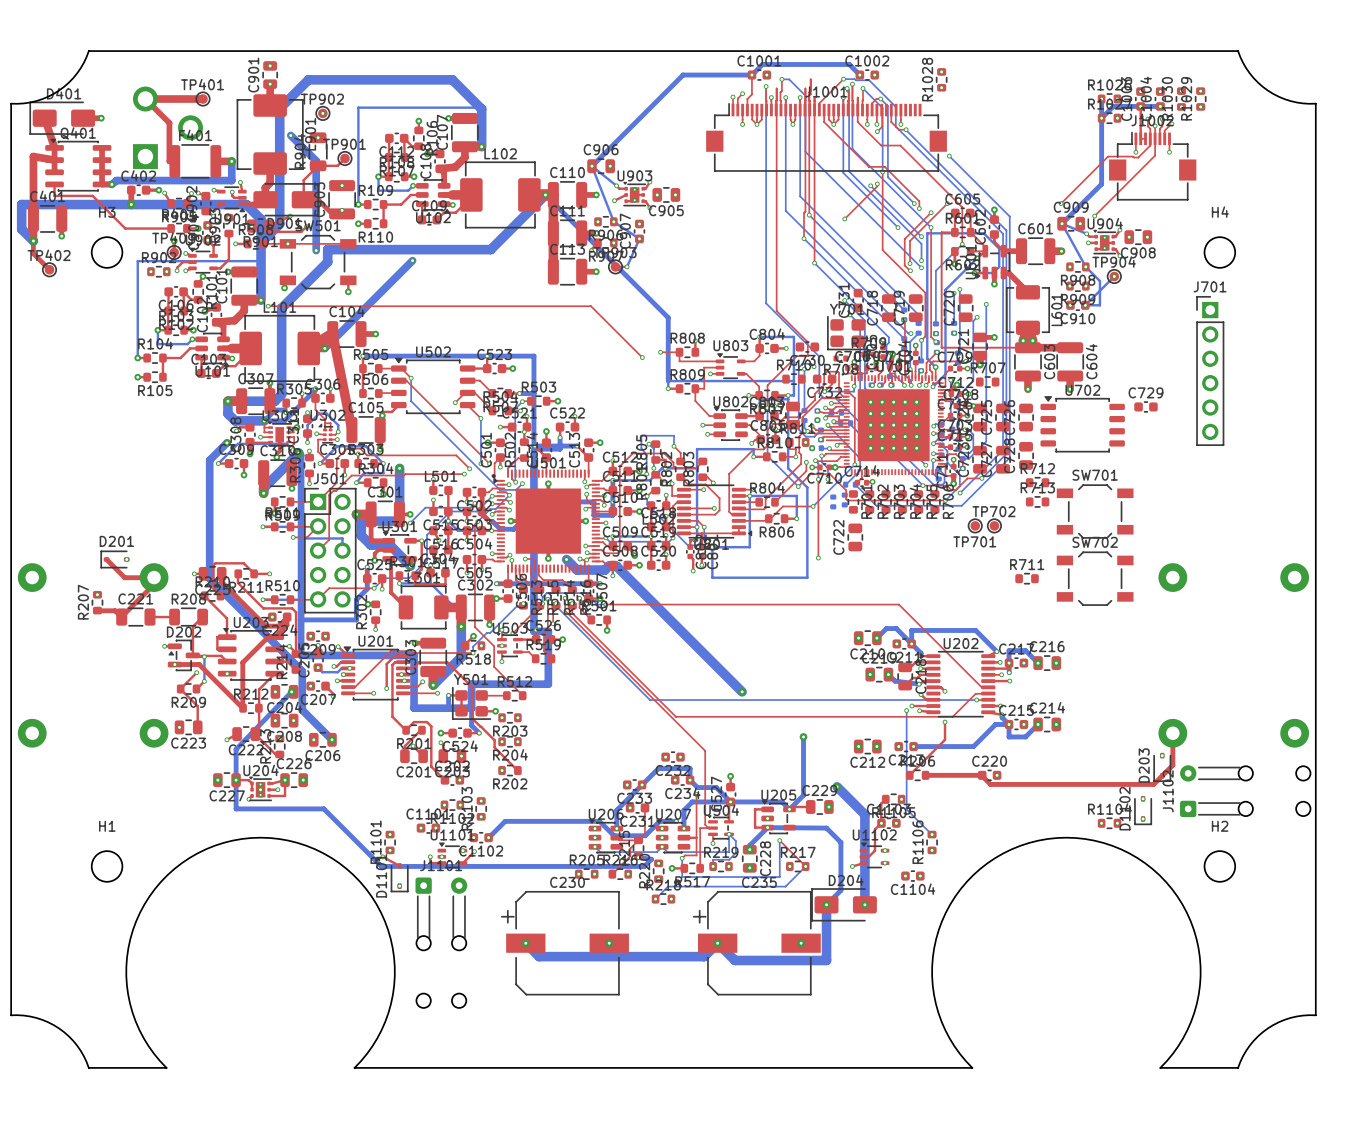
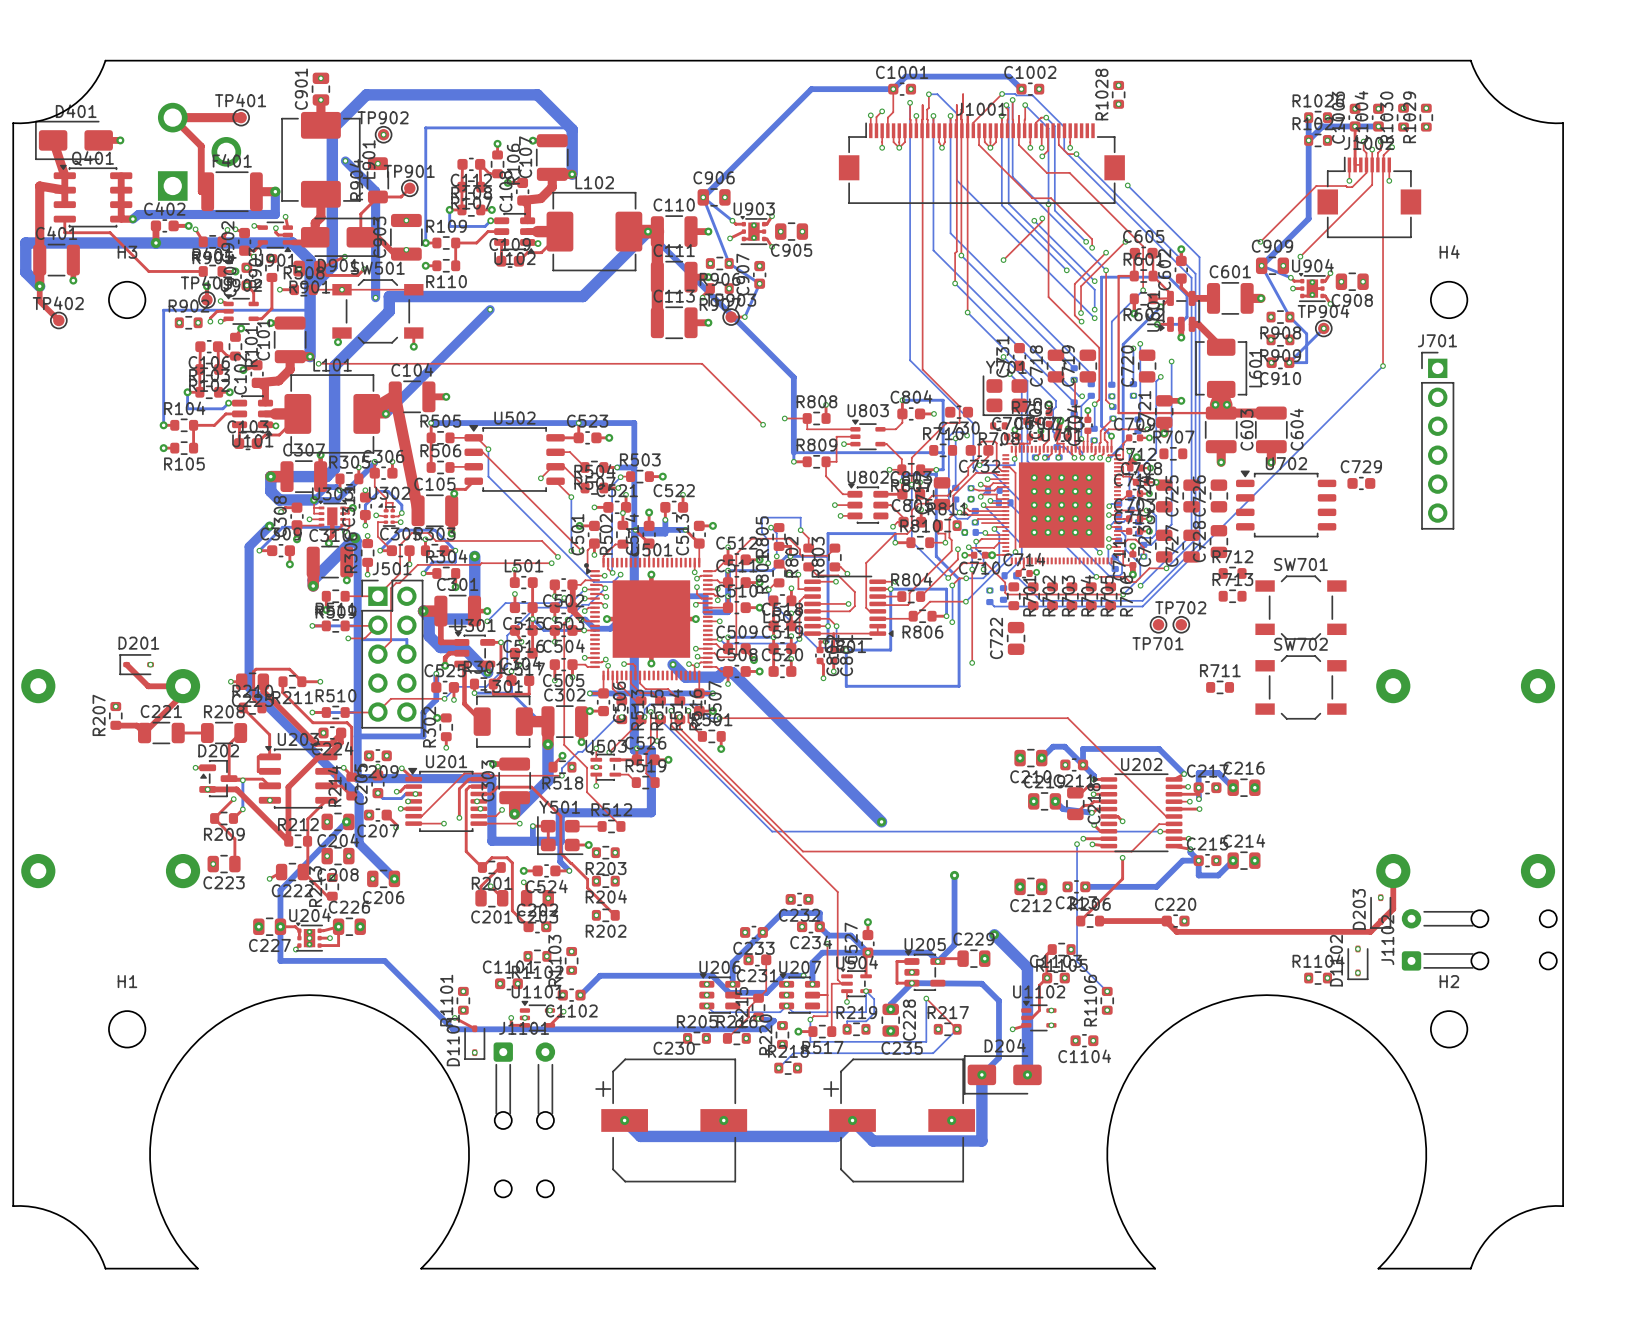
top track: none -> (1383, 164) (1383, 366)
bottom track: none -> (1383, 366) (1142, 606) (994, 606) (989, 601)
via: none -> (1383, 366)
bottom track: none -> (994, 529) (999, 533) (999, 562) (983, 578) (966, 578)
top track: none -> (966, 578) (959, 578) (952, 585)
via: none -> (966, 578)
bottom track: none -> (952, 585) (952, 622)
via: none -> (952, 585)
via: none -> (989, 590)
via: none -> (952, 622)

